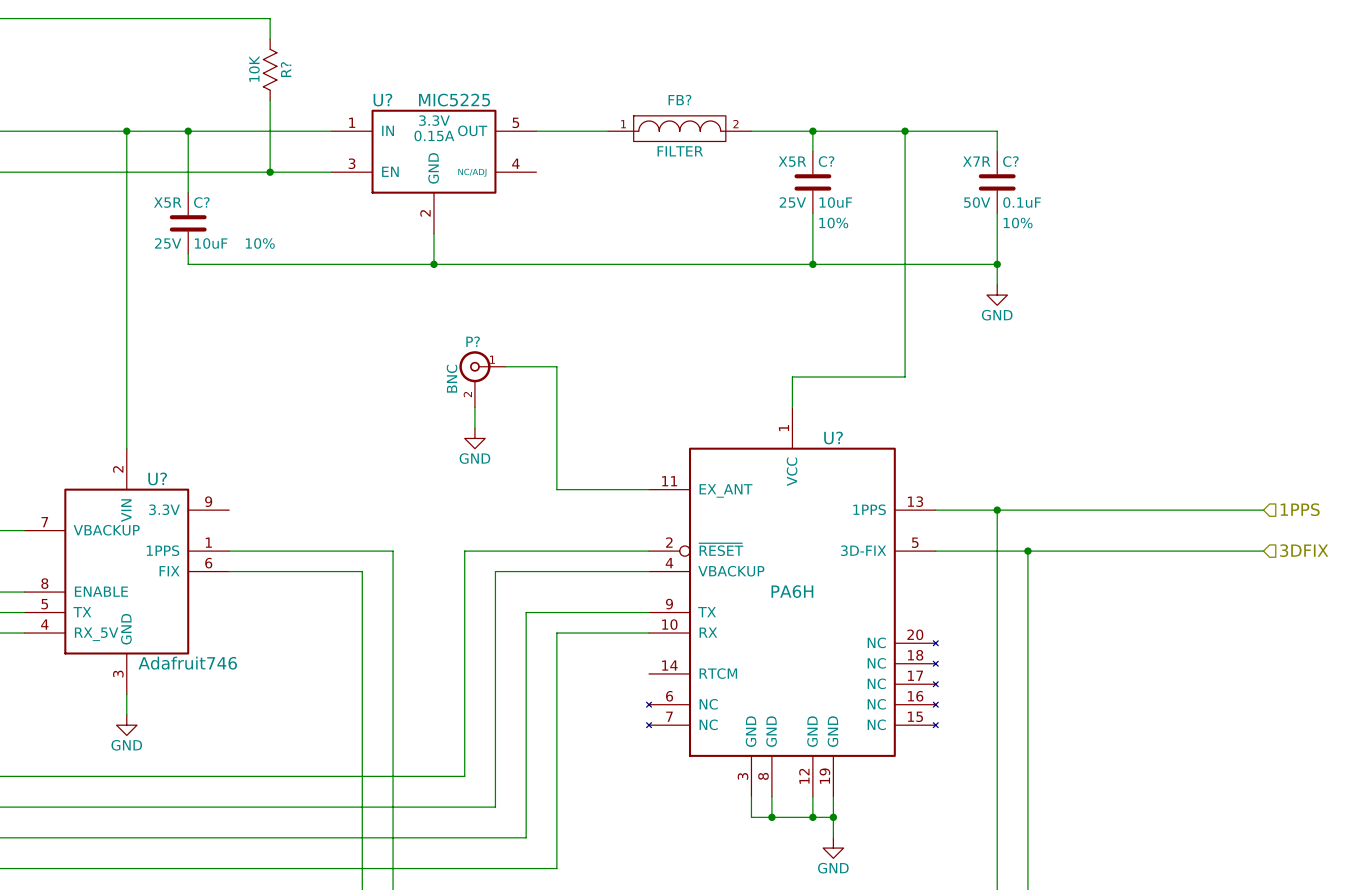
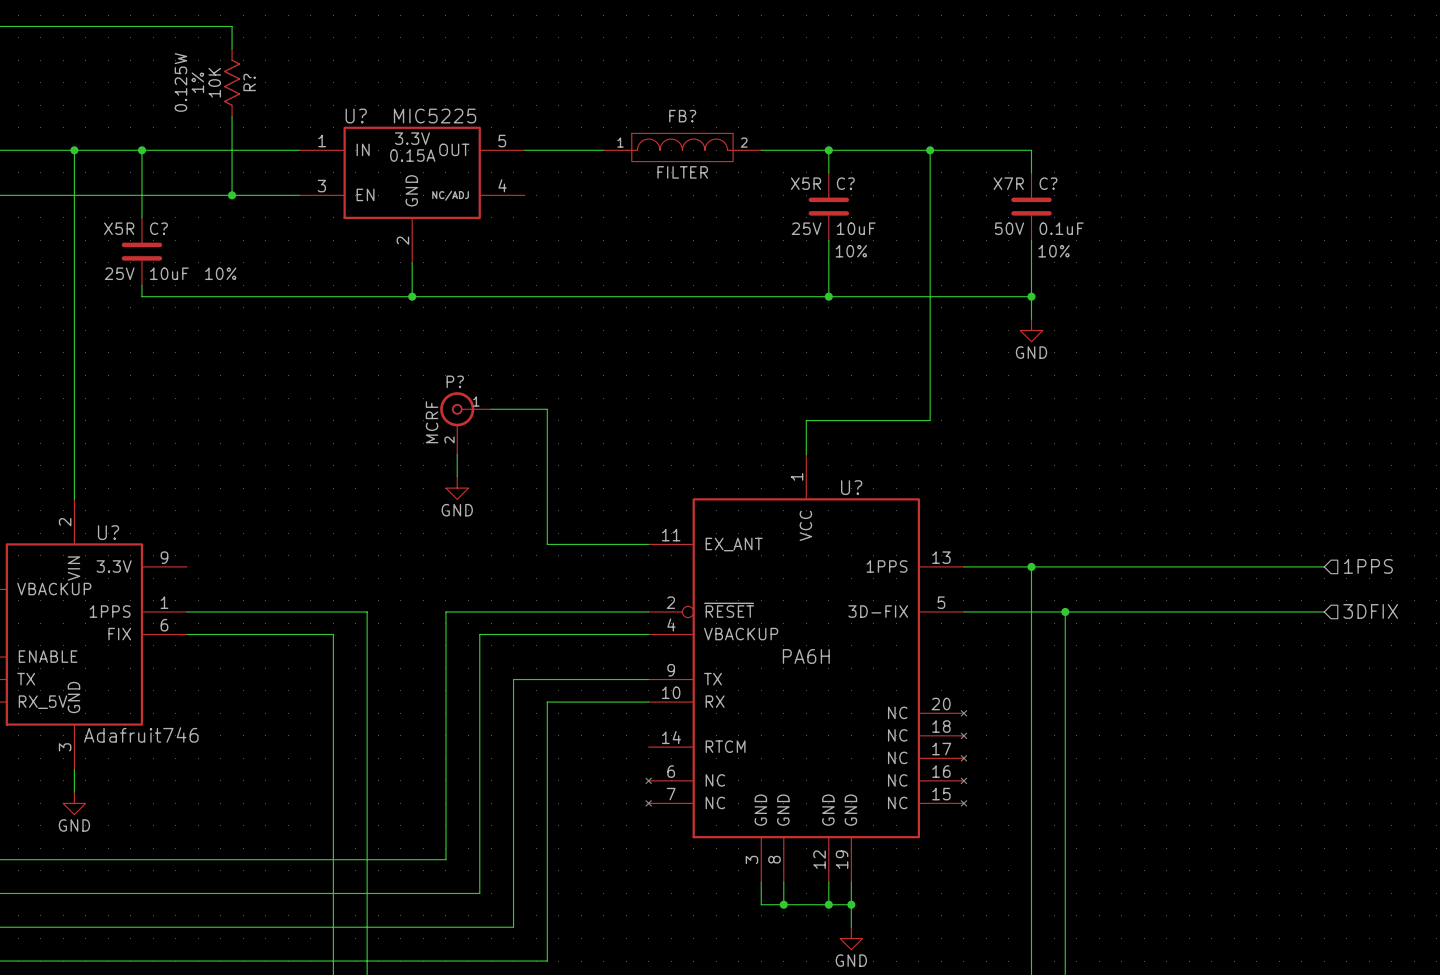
R? text: none -> 0.125W (180, 82)
R? text: none -> 1% (197, 82)
P? value: BNC (452, 378) -> MCRF (432, 422)

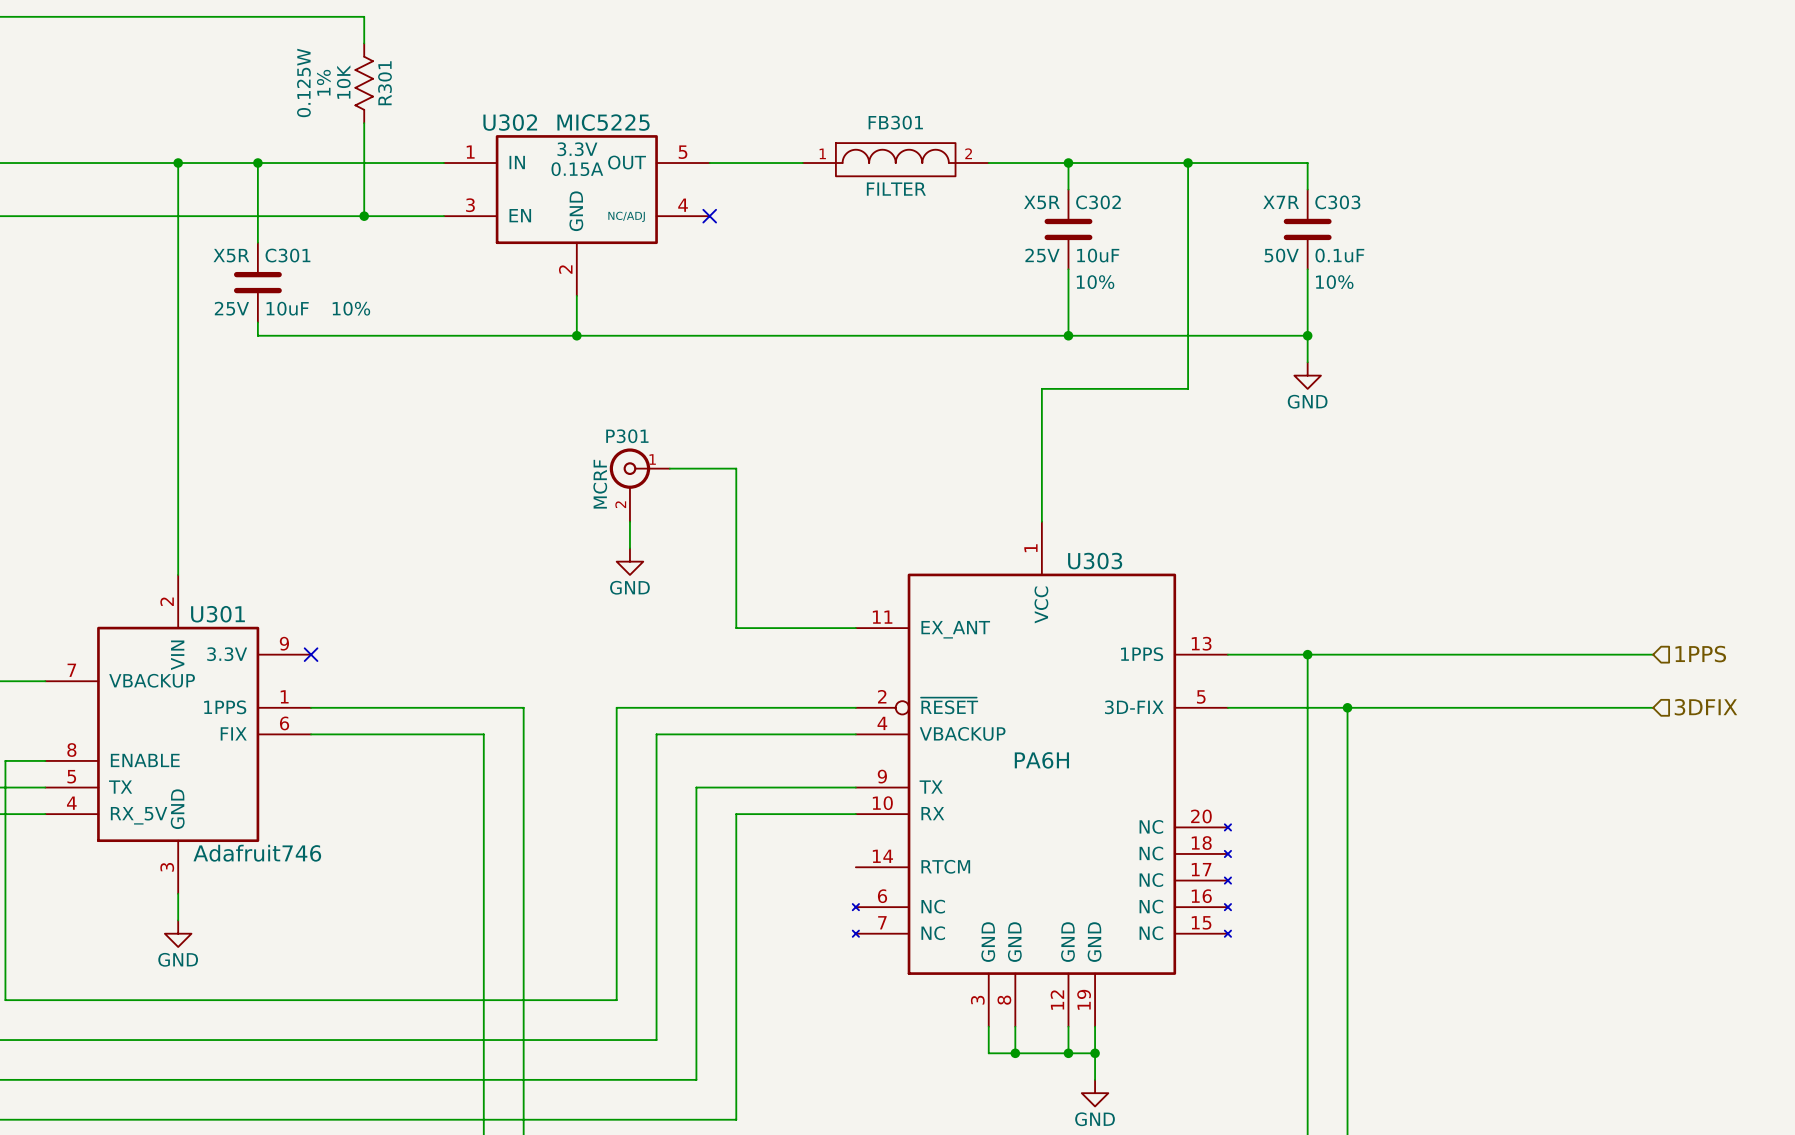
R? name: R? (249, 82) -> R301 (384, 83)
U? name: U? (356, 116) -> U302 (510, 122)
FB? name: FB? (682, 116) -> FB301 (895, 122)
C? name: C? (845, 183) -> C302 (1098, 202)
C? name: C? (1048, 183) -> C303 (1337, 202)
no-connect mark: none -> (709, 216)
C? name: C? (158, 228) -> C301 (287, 255)
wire: (930, 341) (930, 420) (806, 420) -> (1188, 388) (1041, 388) (1041, 481)
P? name: P? (455, 381) -> P301 (627, 436)
U? name: U? (851, 487) -> U303 (1095, 561)
U? name: U? (108, 532) -> U301 (217, 614)
no-connect mark: none -> (311, 654)

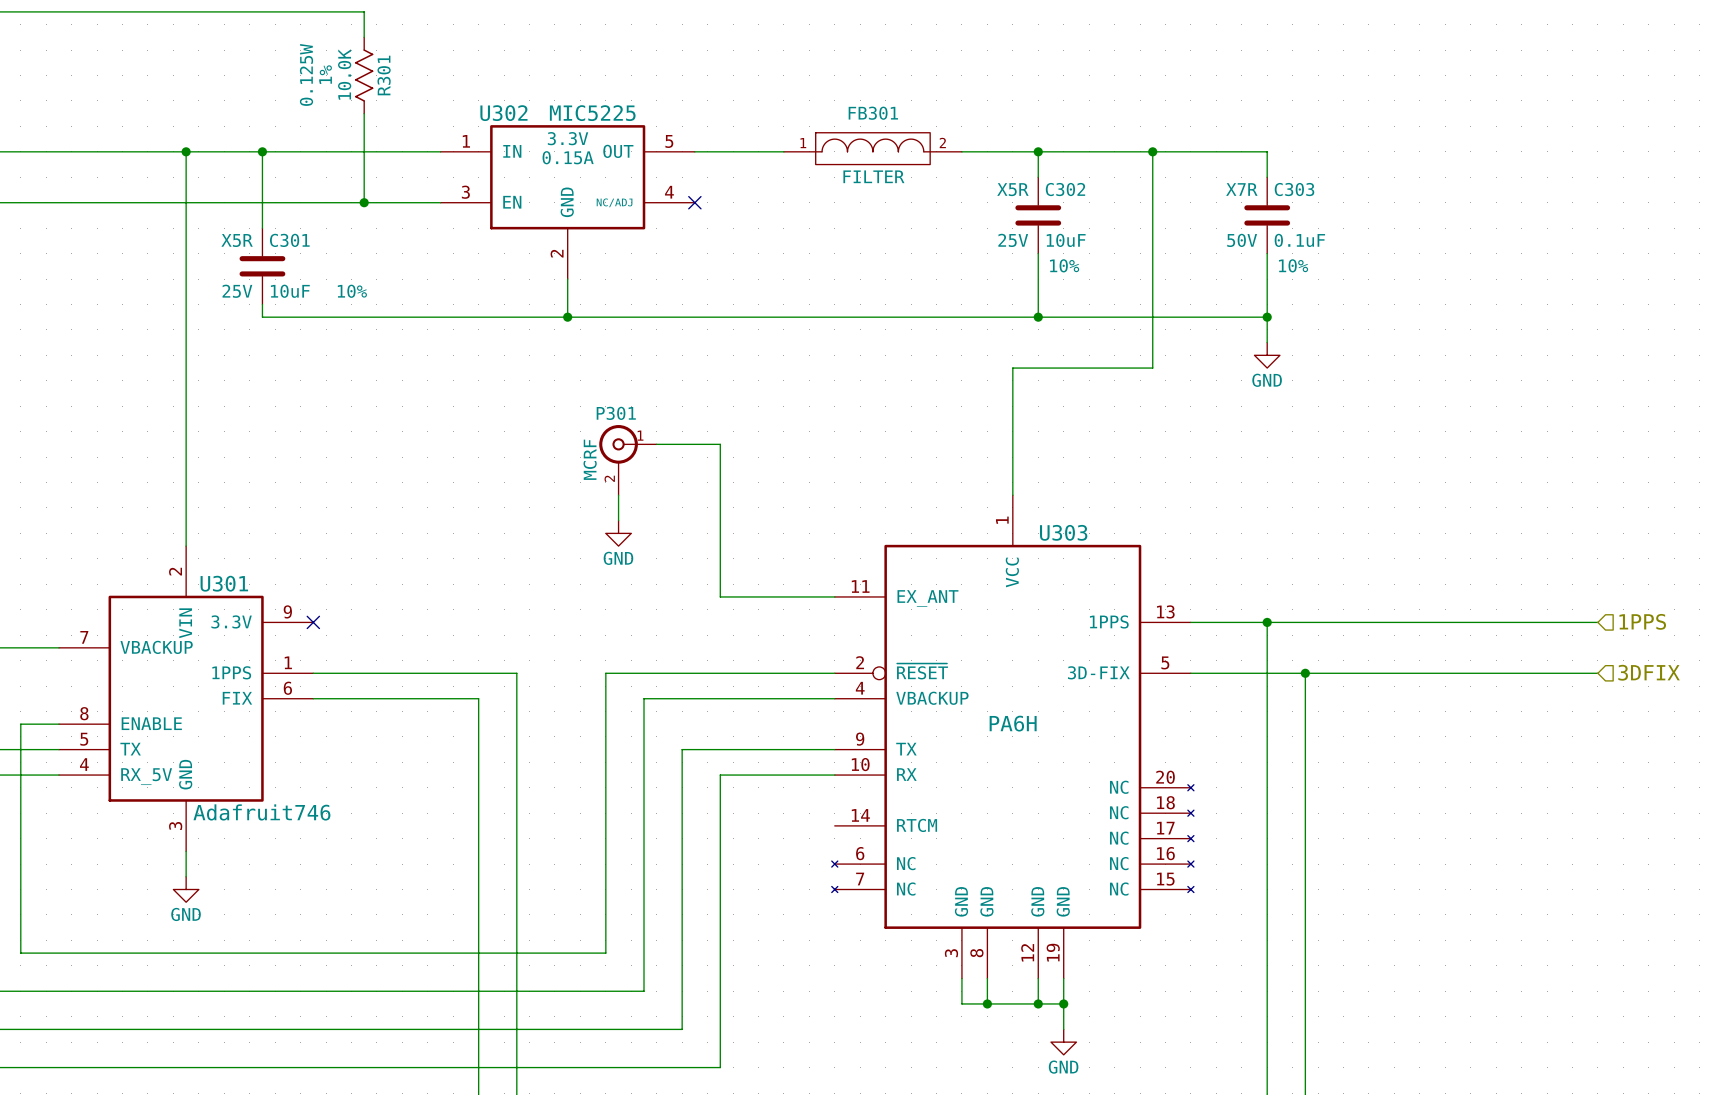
R301 value: 10K (343, 82) -> 10.0K (344, 74)

